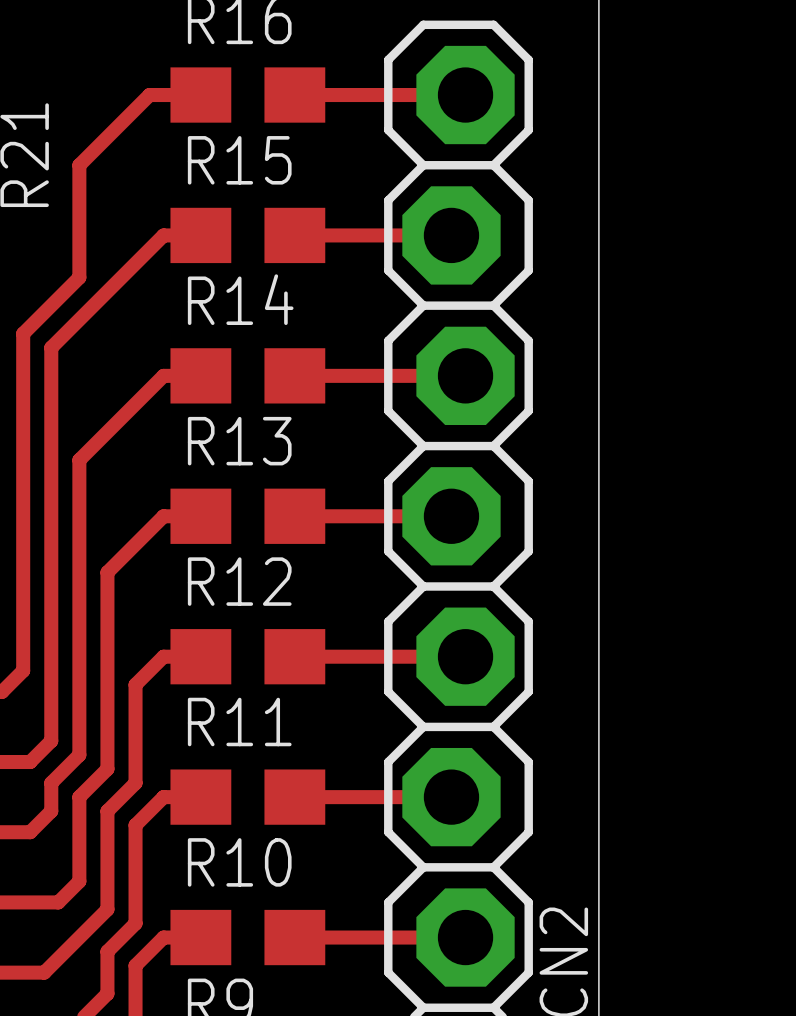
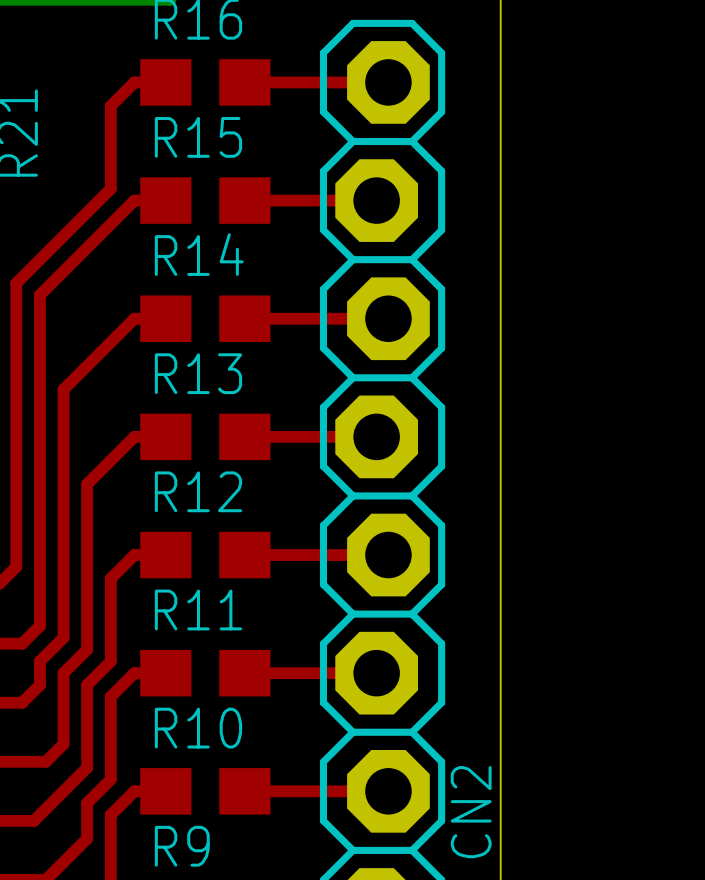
top track: (163, 95) (149, 95) (79, 165) (79, 277) -> (134, 82) (110, 106) (110, 188) (63, 236)

